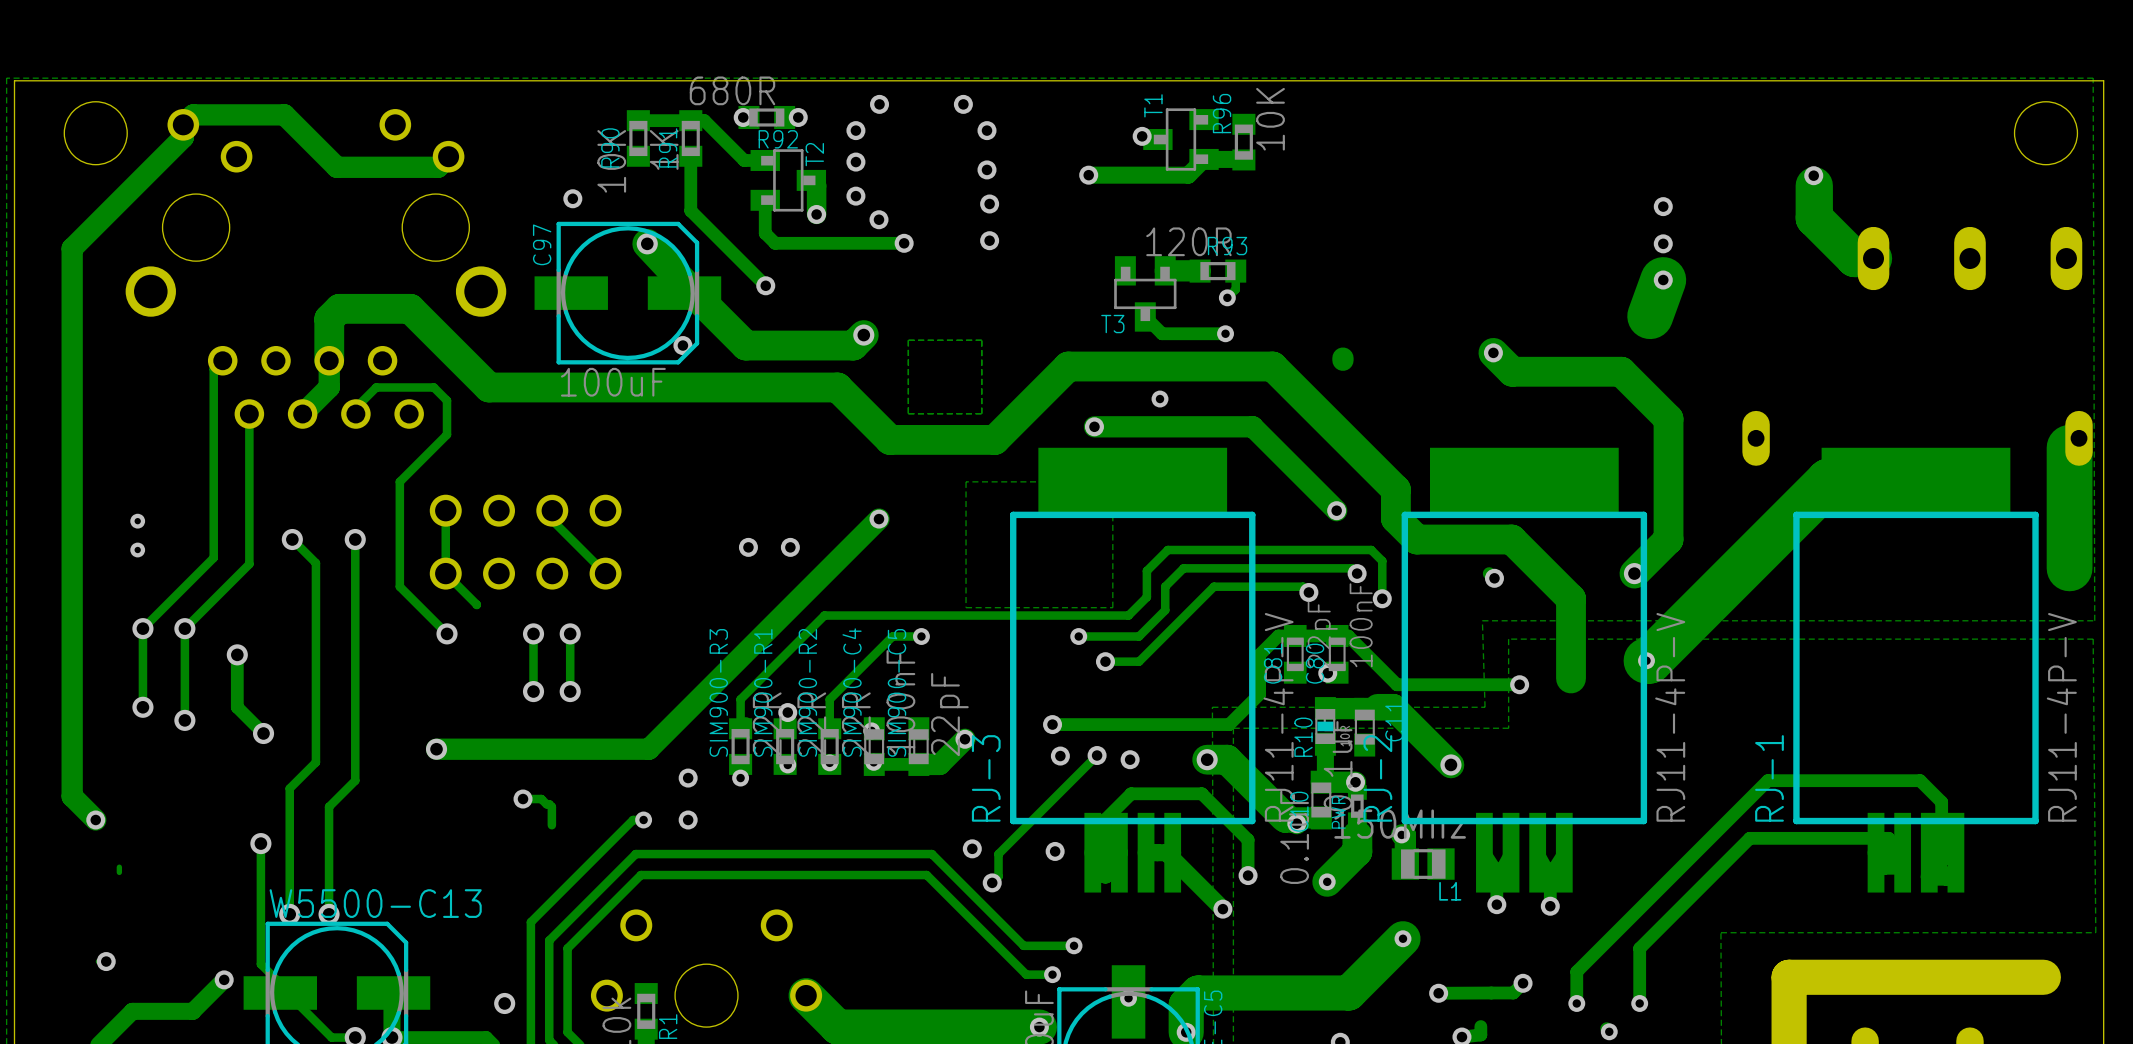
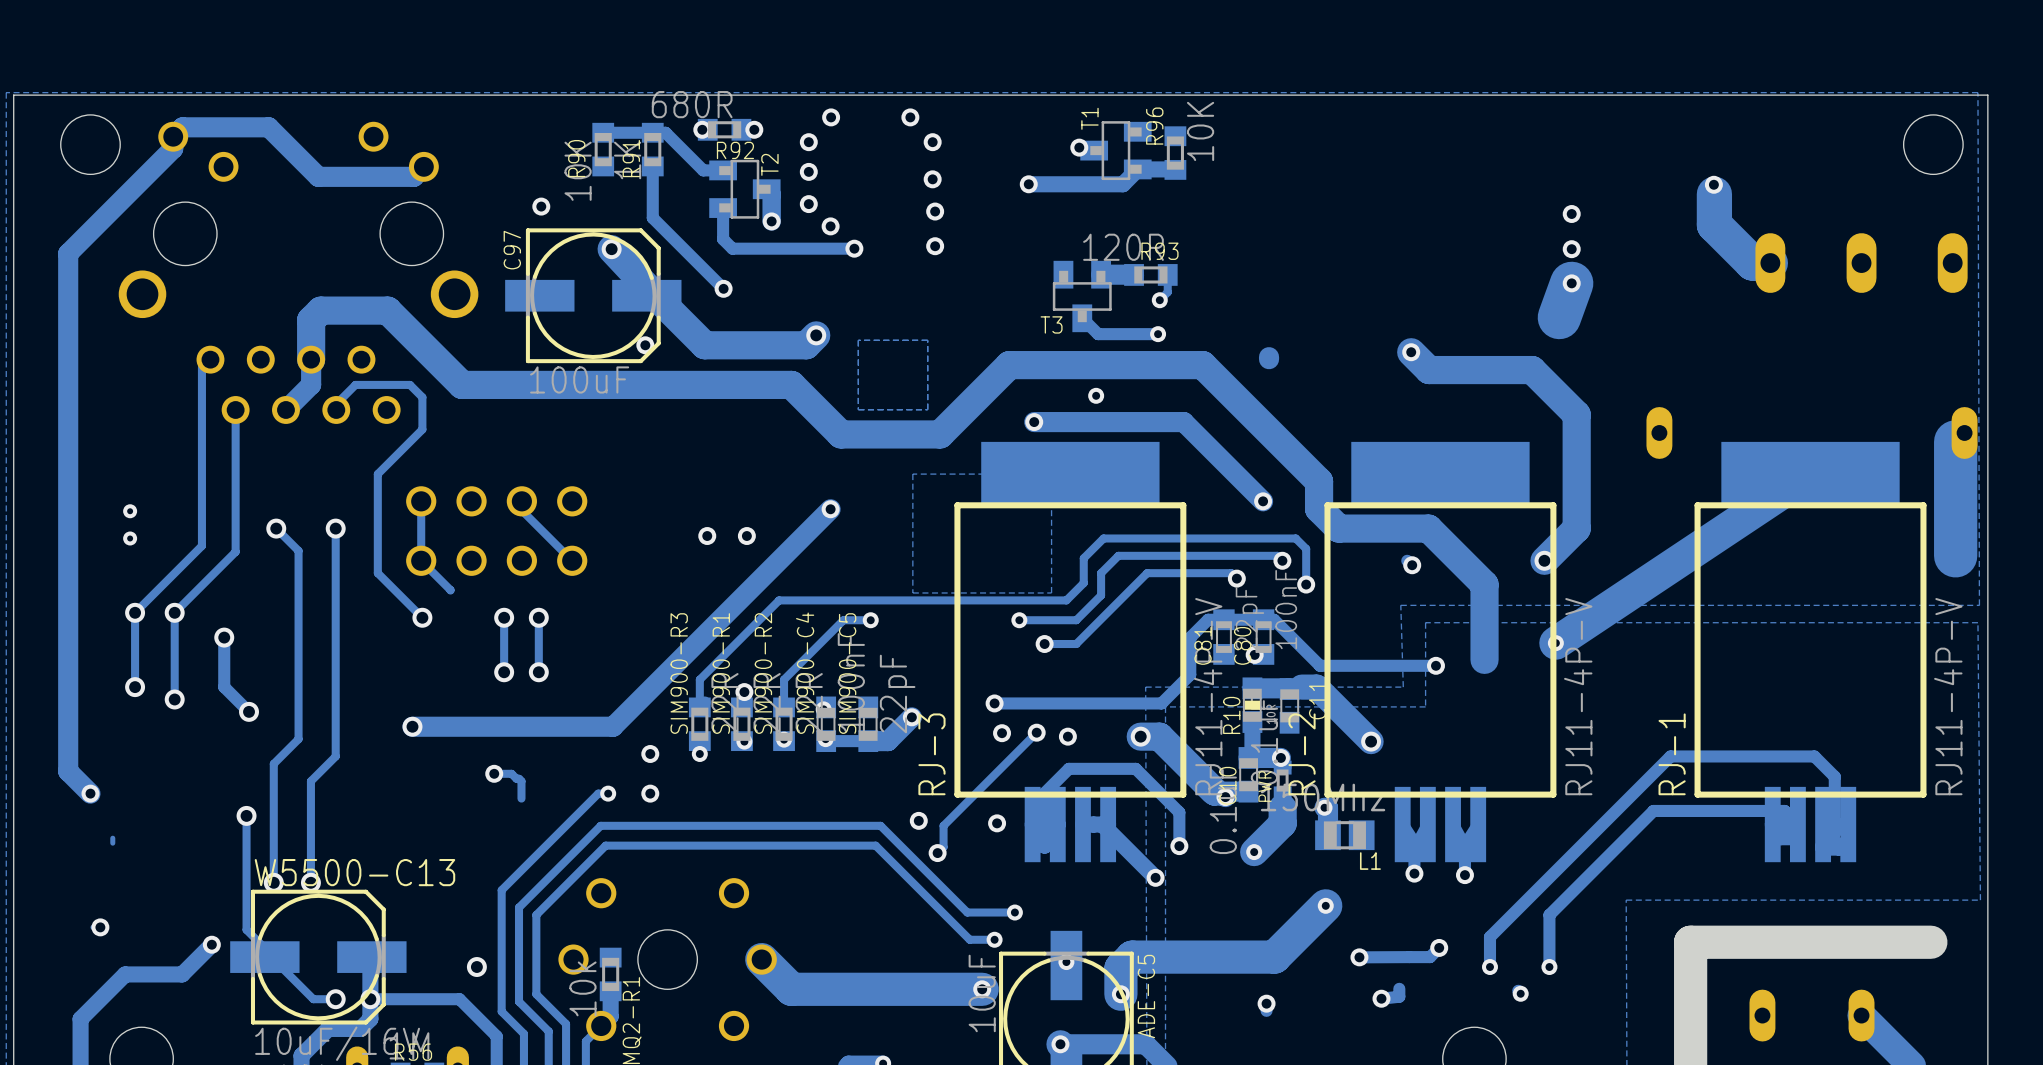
track: (1915, 481) (1828, 481) (1649, 660) (1646, 660) -> (1810, 473) (1555, 643)

